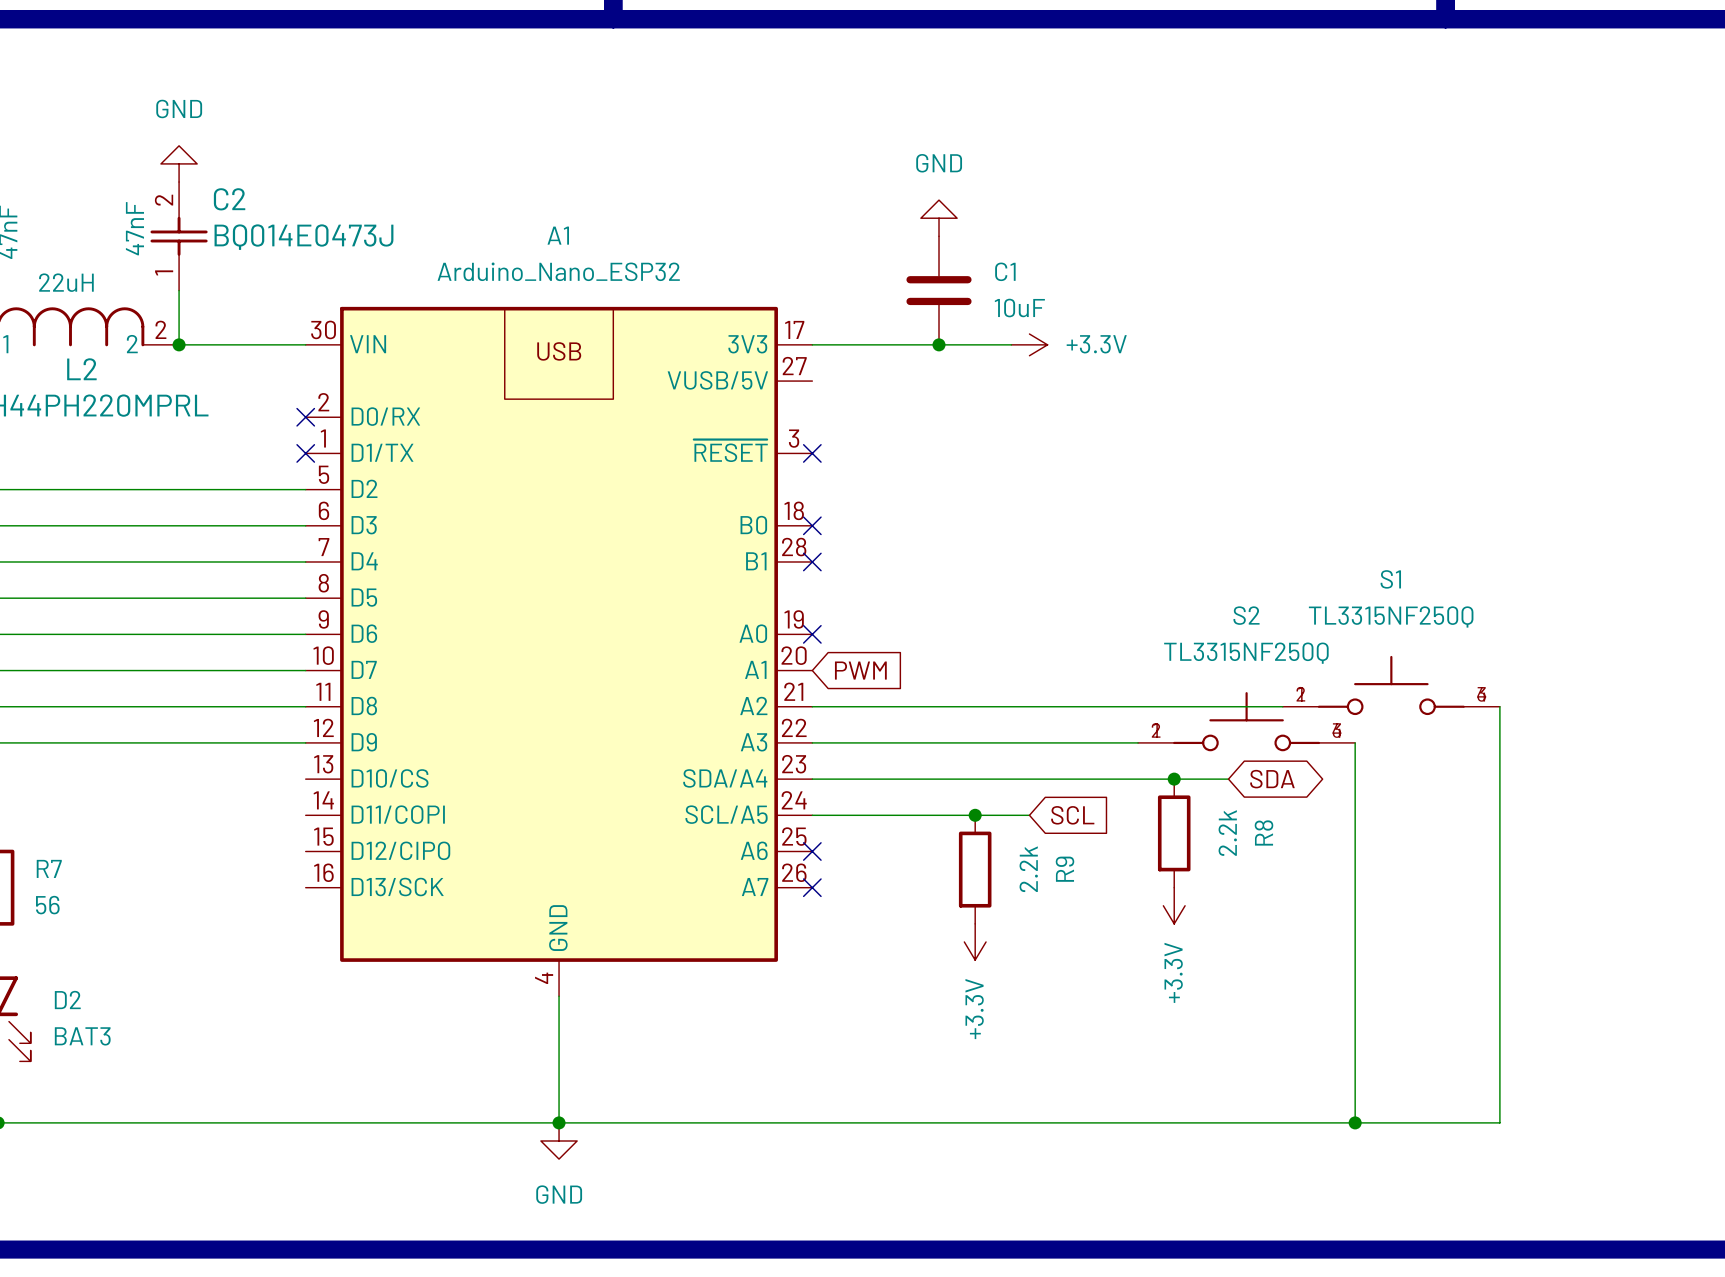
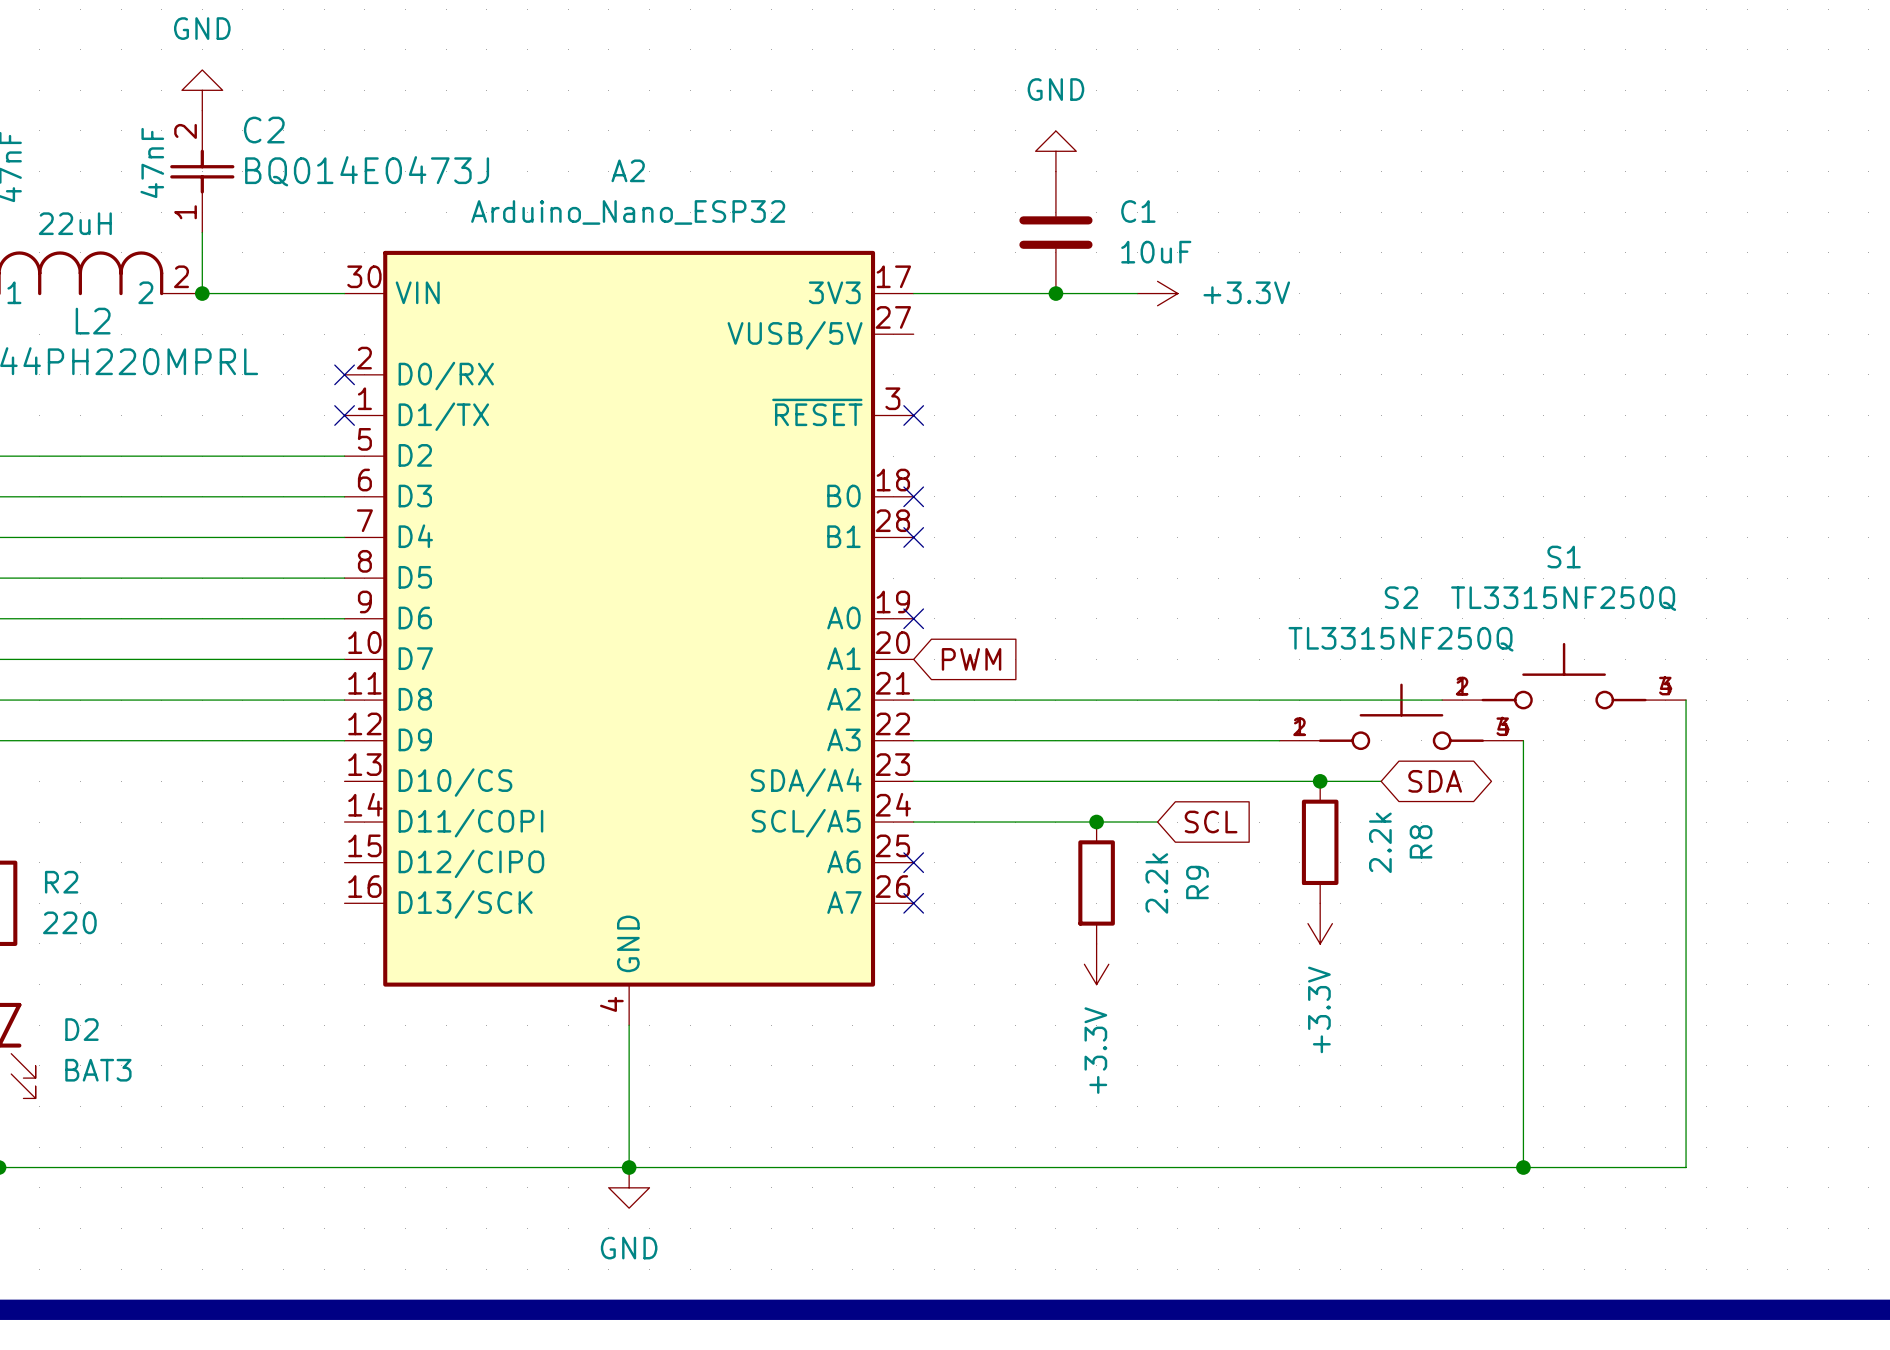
A1: Arduino_Nano_ESP32 (559, 651) -> none
A2: none -> Arduino_Nano_ESP32 (629, 638)
R7 name: R7 (49, 868) -> R2 (61, 882)
R7 value: 56 (47, 905) -> 220 (69, 922)

